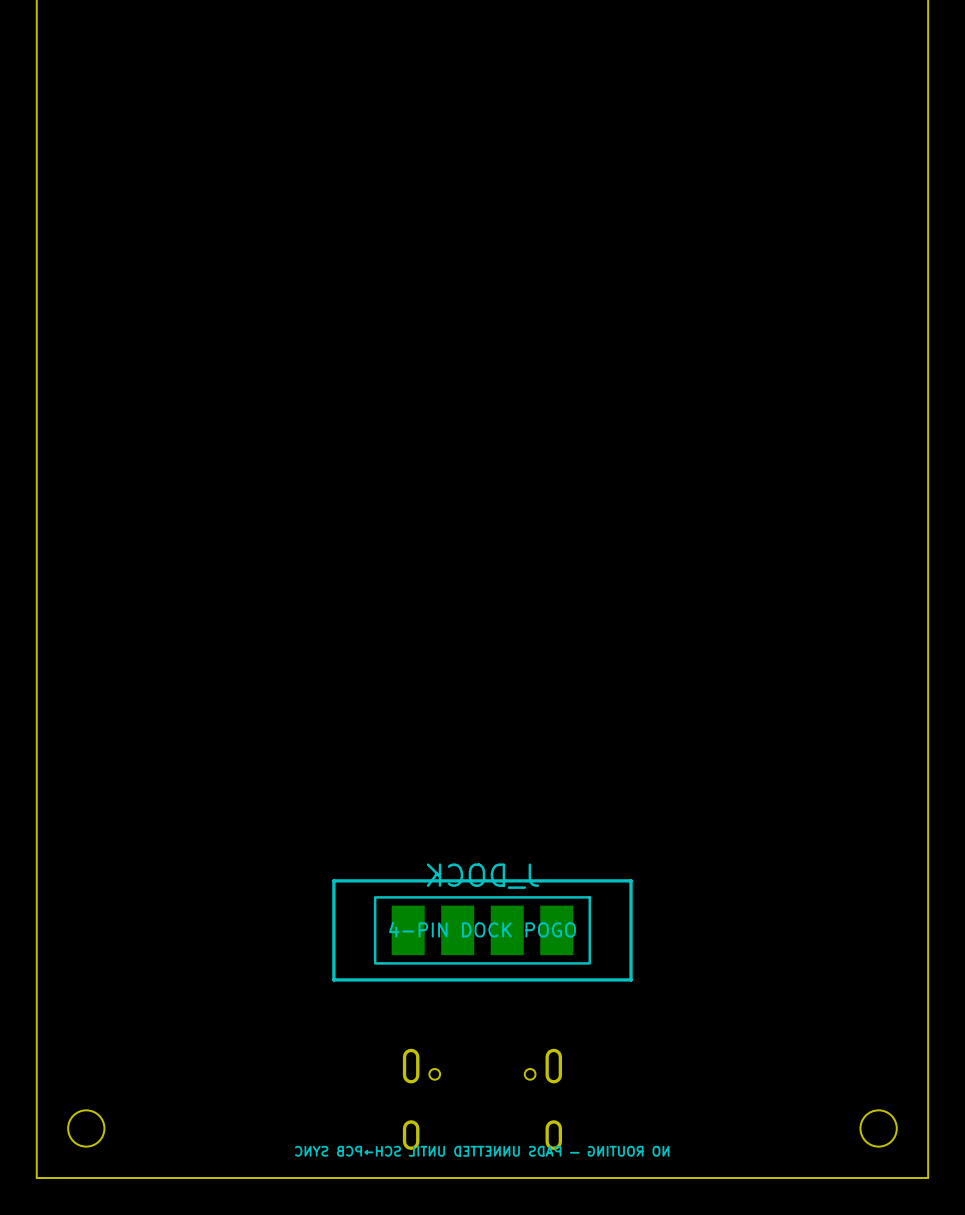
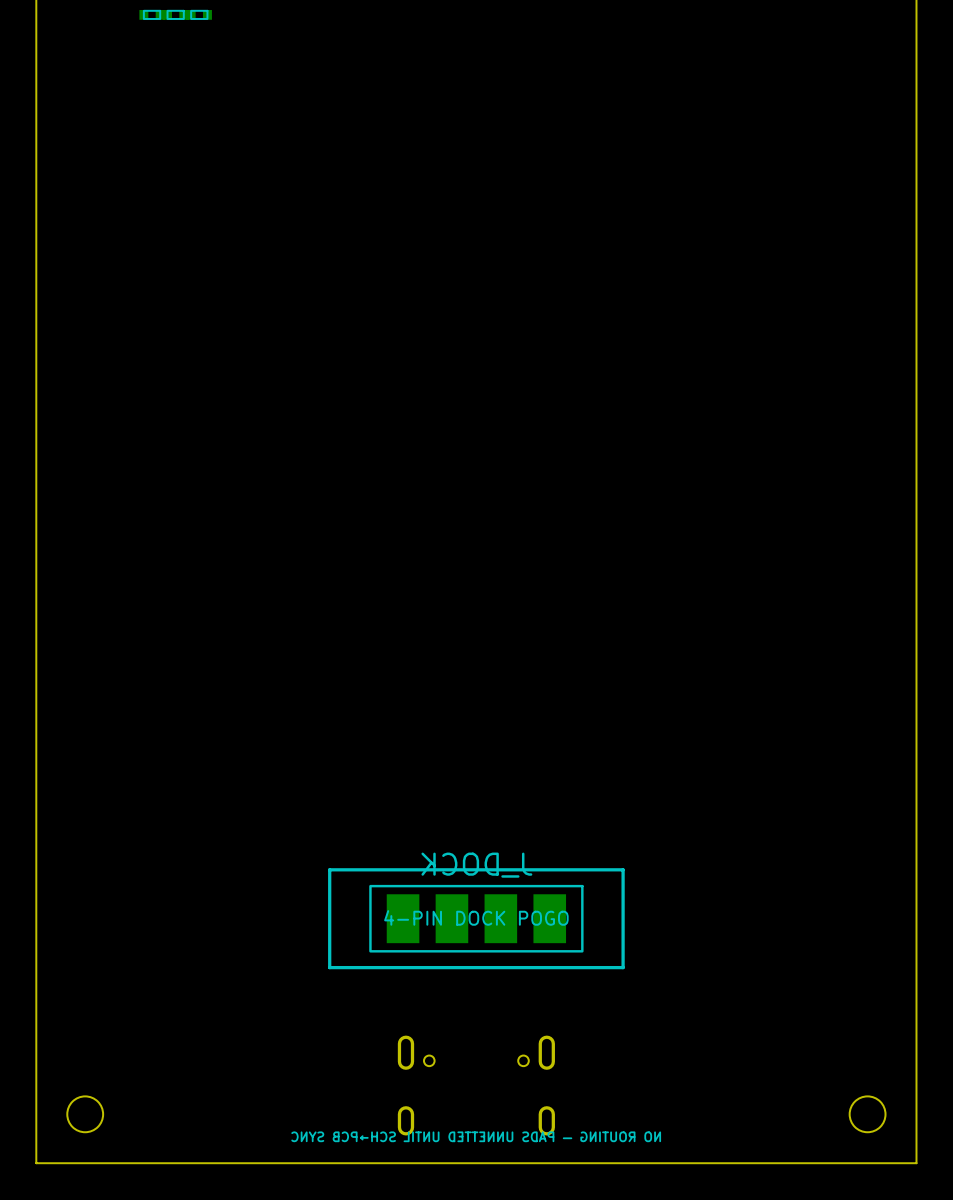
part: none -> (152, 14)
part: none -> (175, 14)
part: none -> (199, 14)

